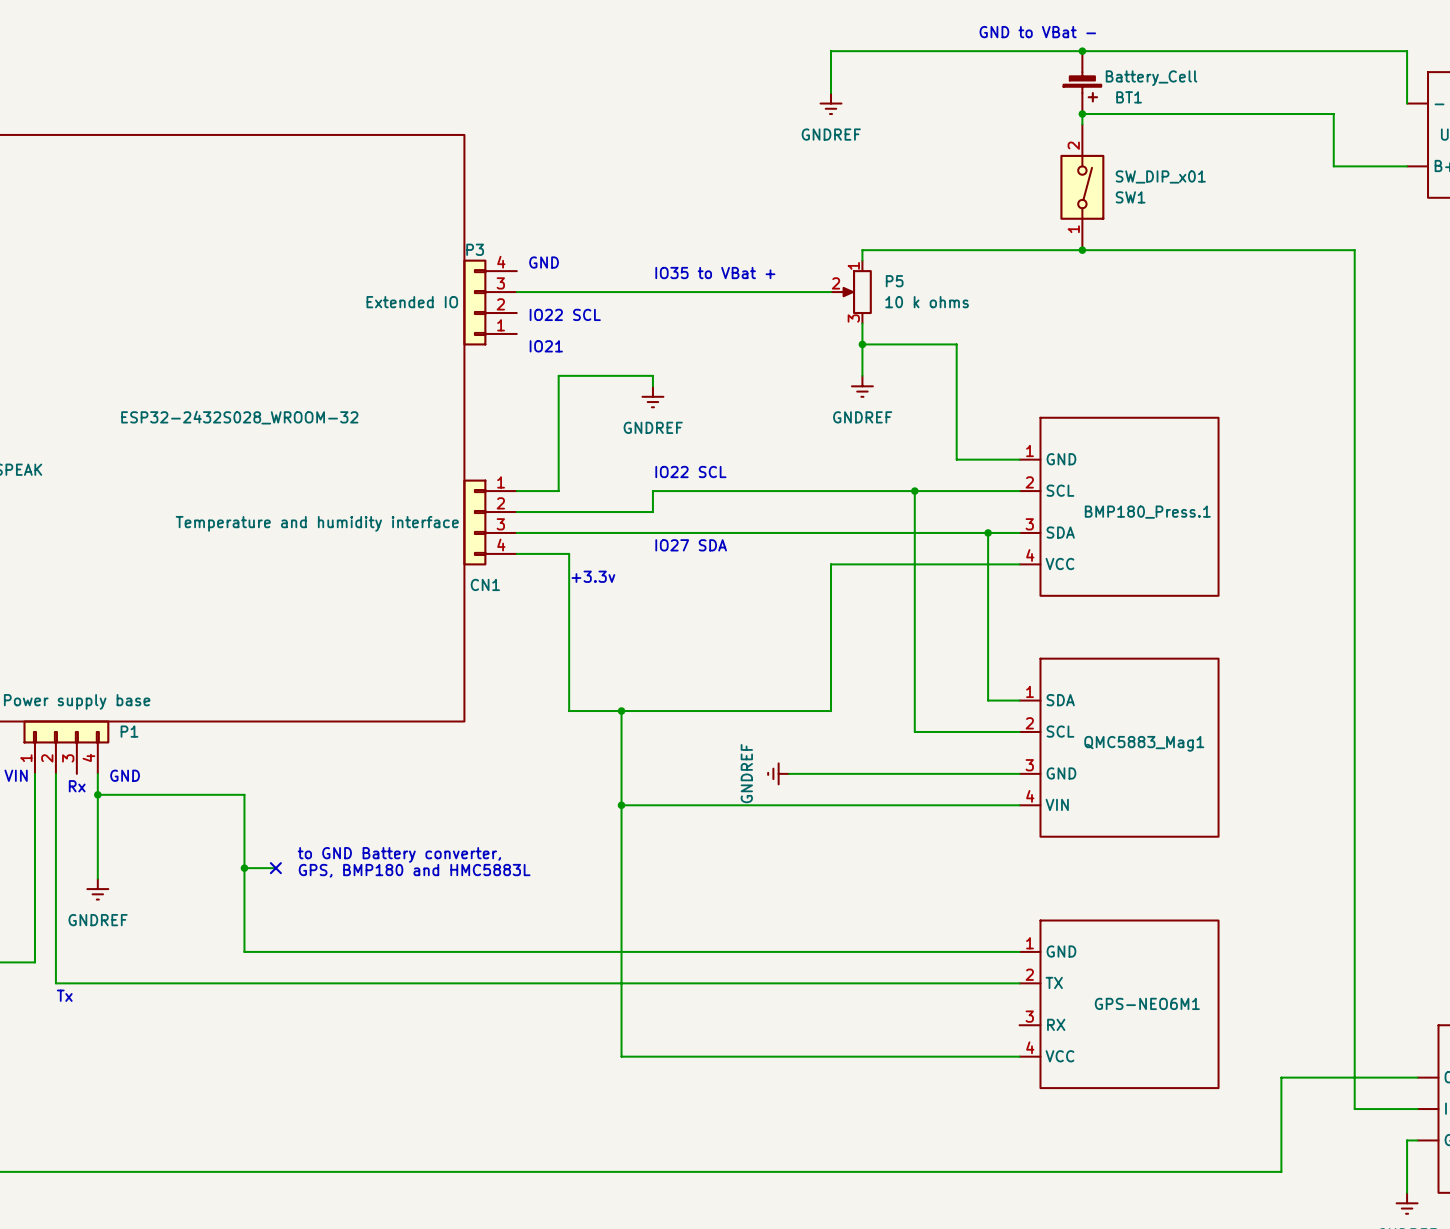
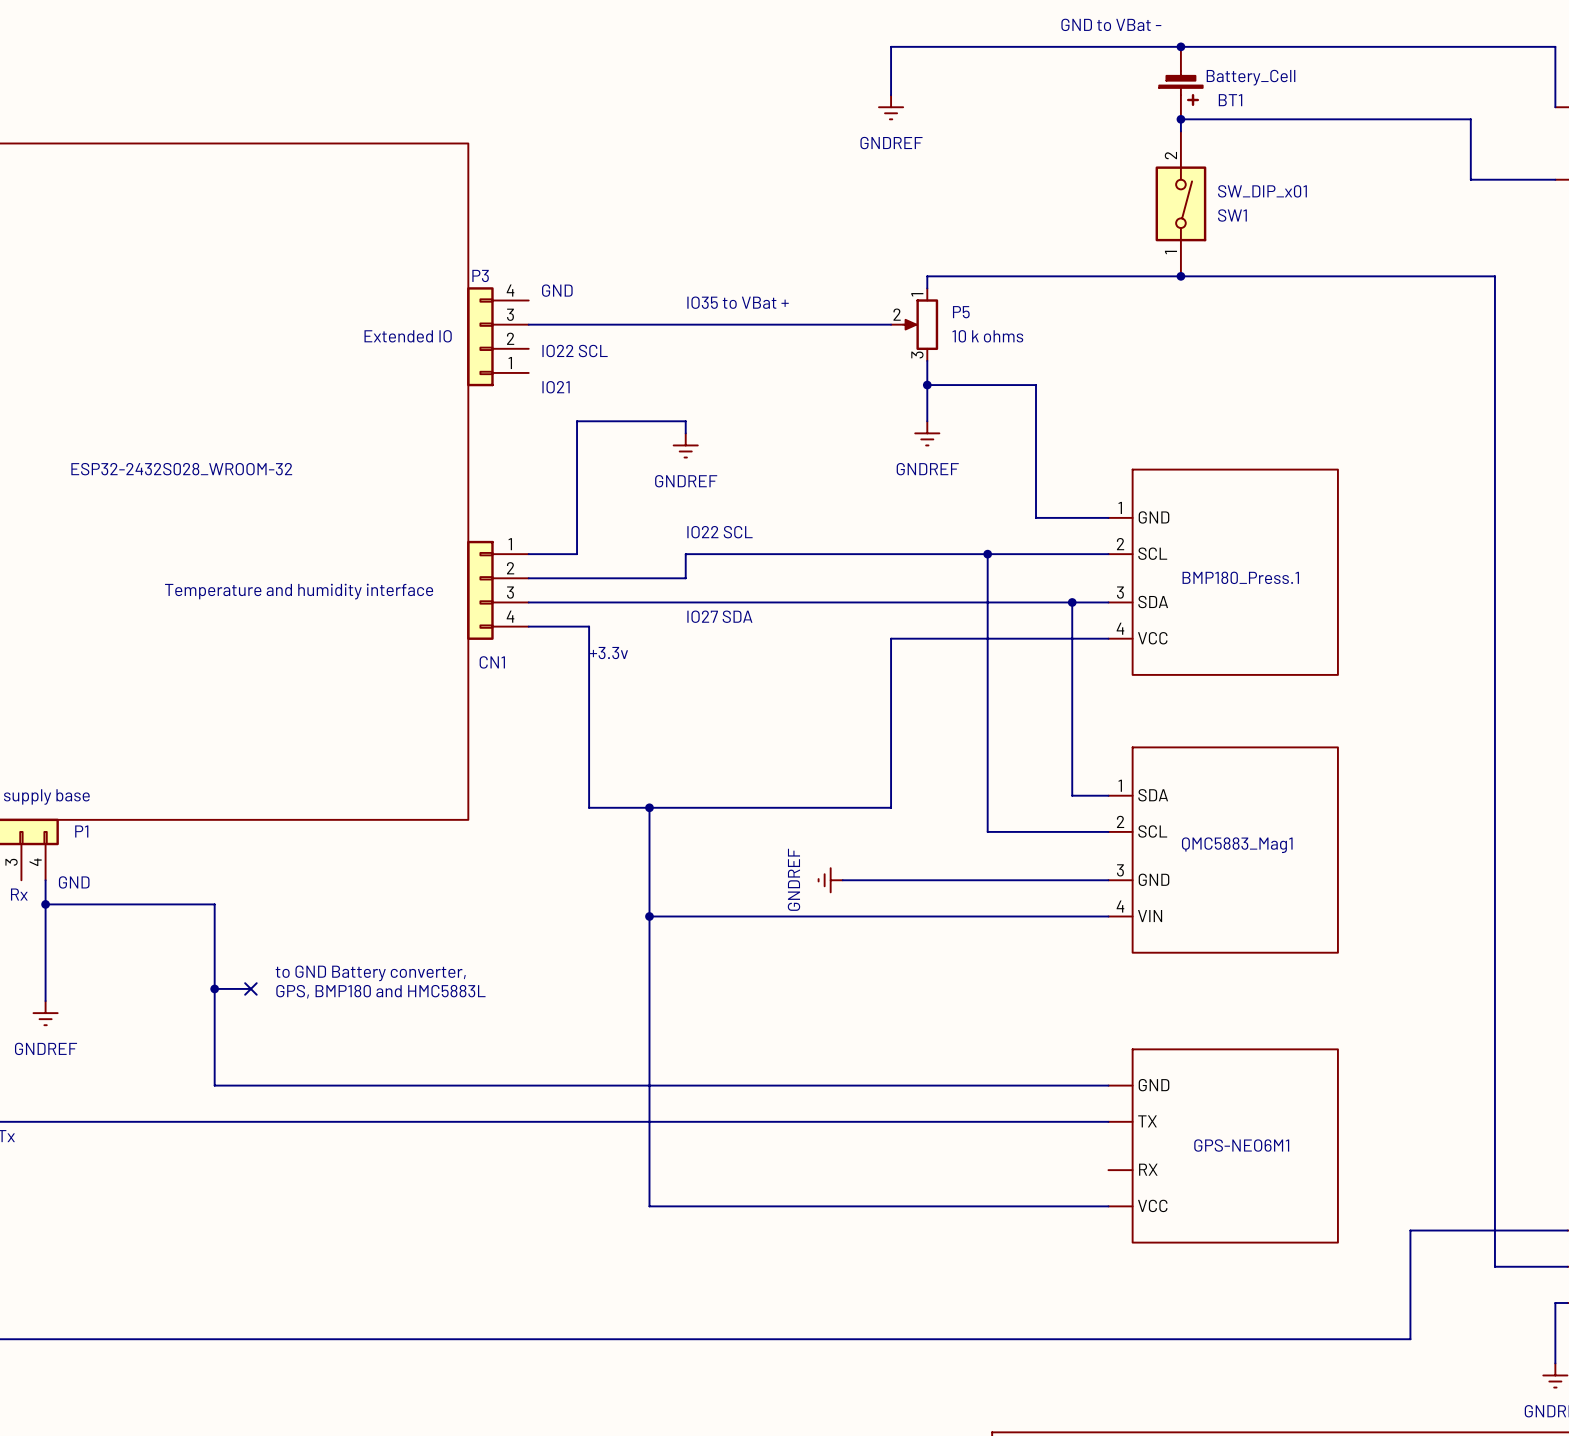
GPS-NEO6M1 pin number: 1 (1030, 943) -> none
GPS-NEO6M1 pin number: 2 (1029, 974) -> none
GPS-NEO6M1 pin number: 3 (1029, 1016) -> none
GPS-NEO6M1 pin number: 4 (1030, 1047) -> none

